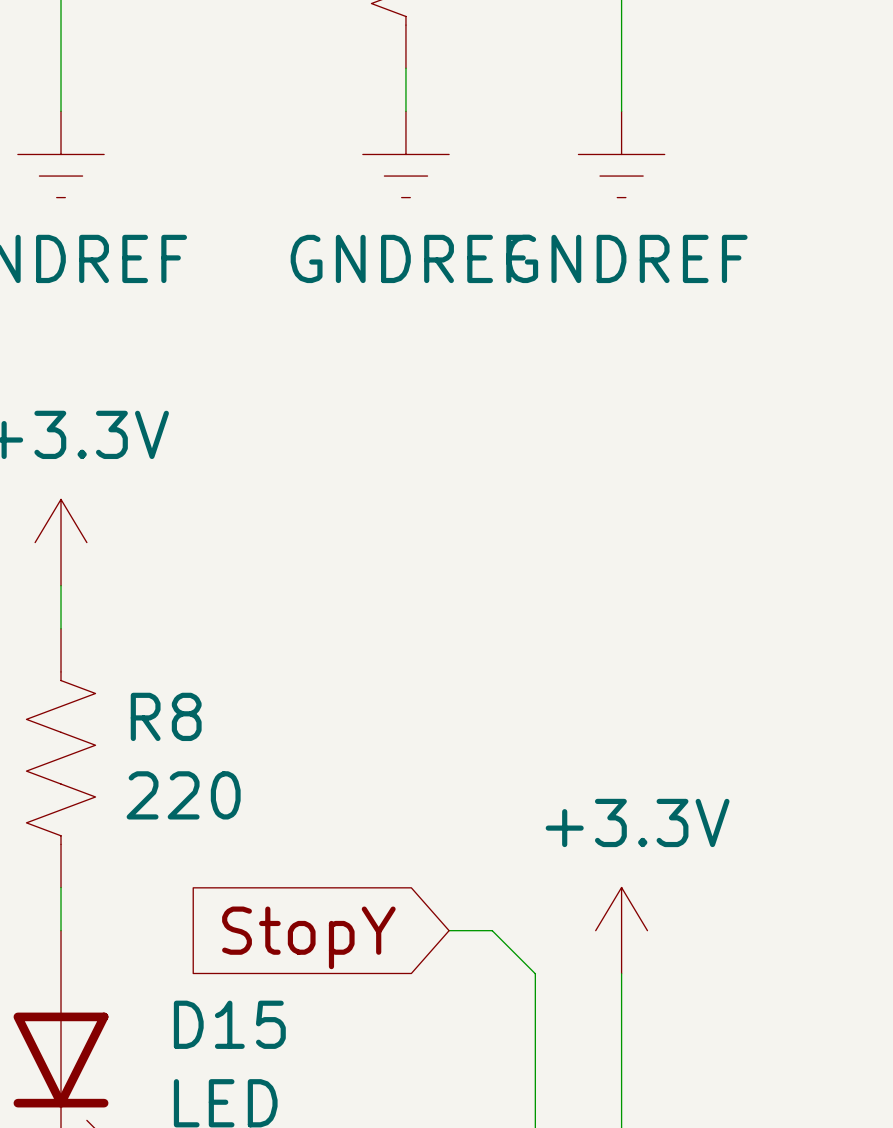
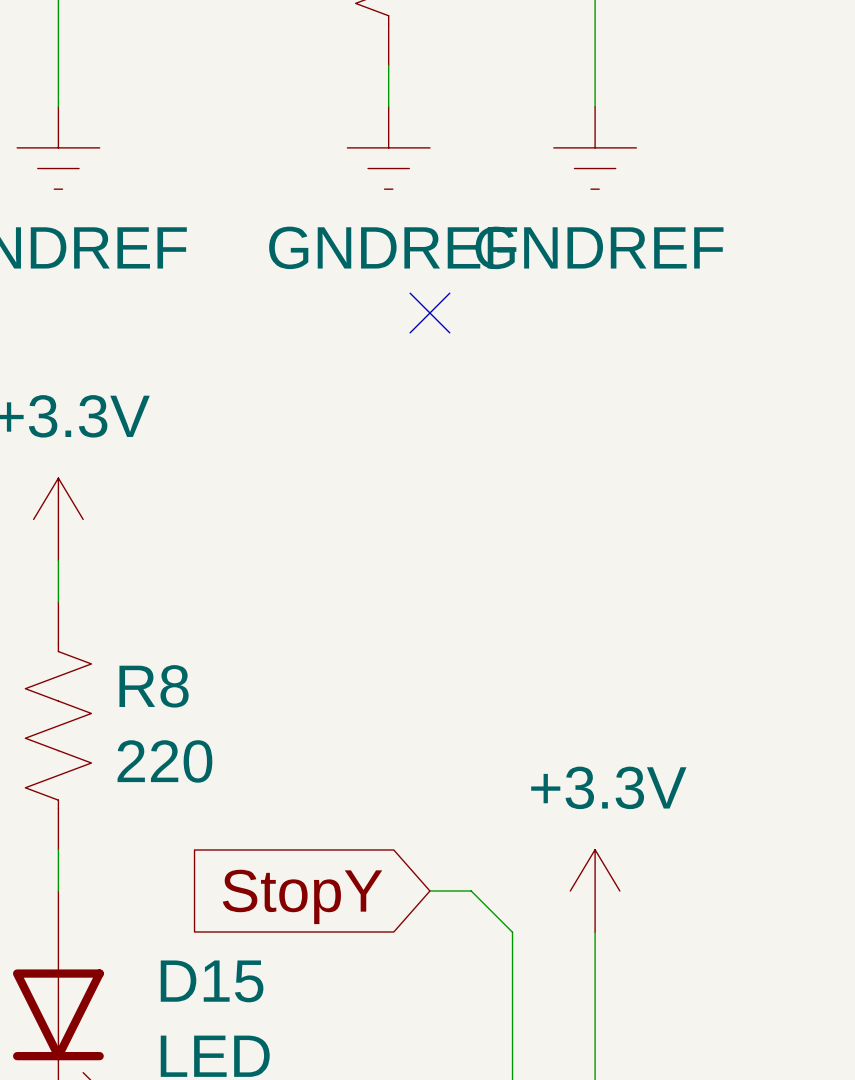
no-connect mark: none -> (429, 313)

